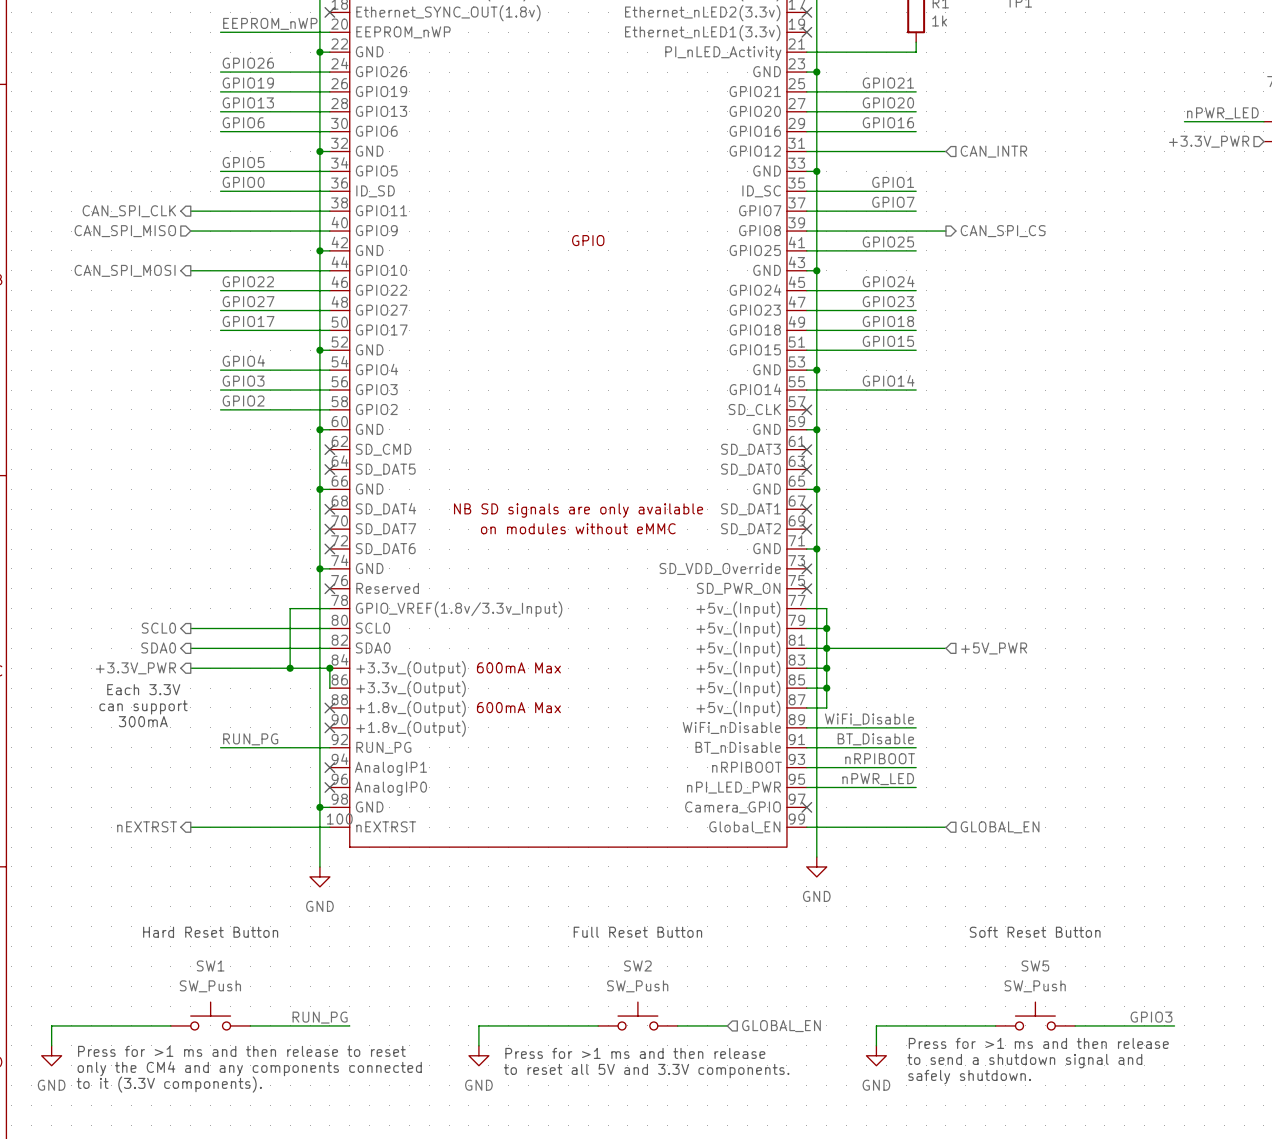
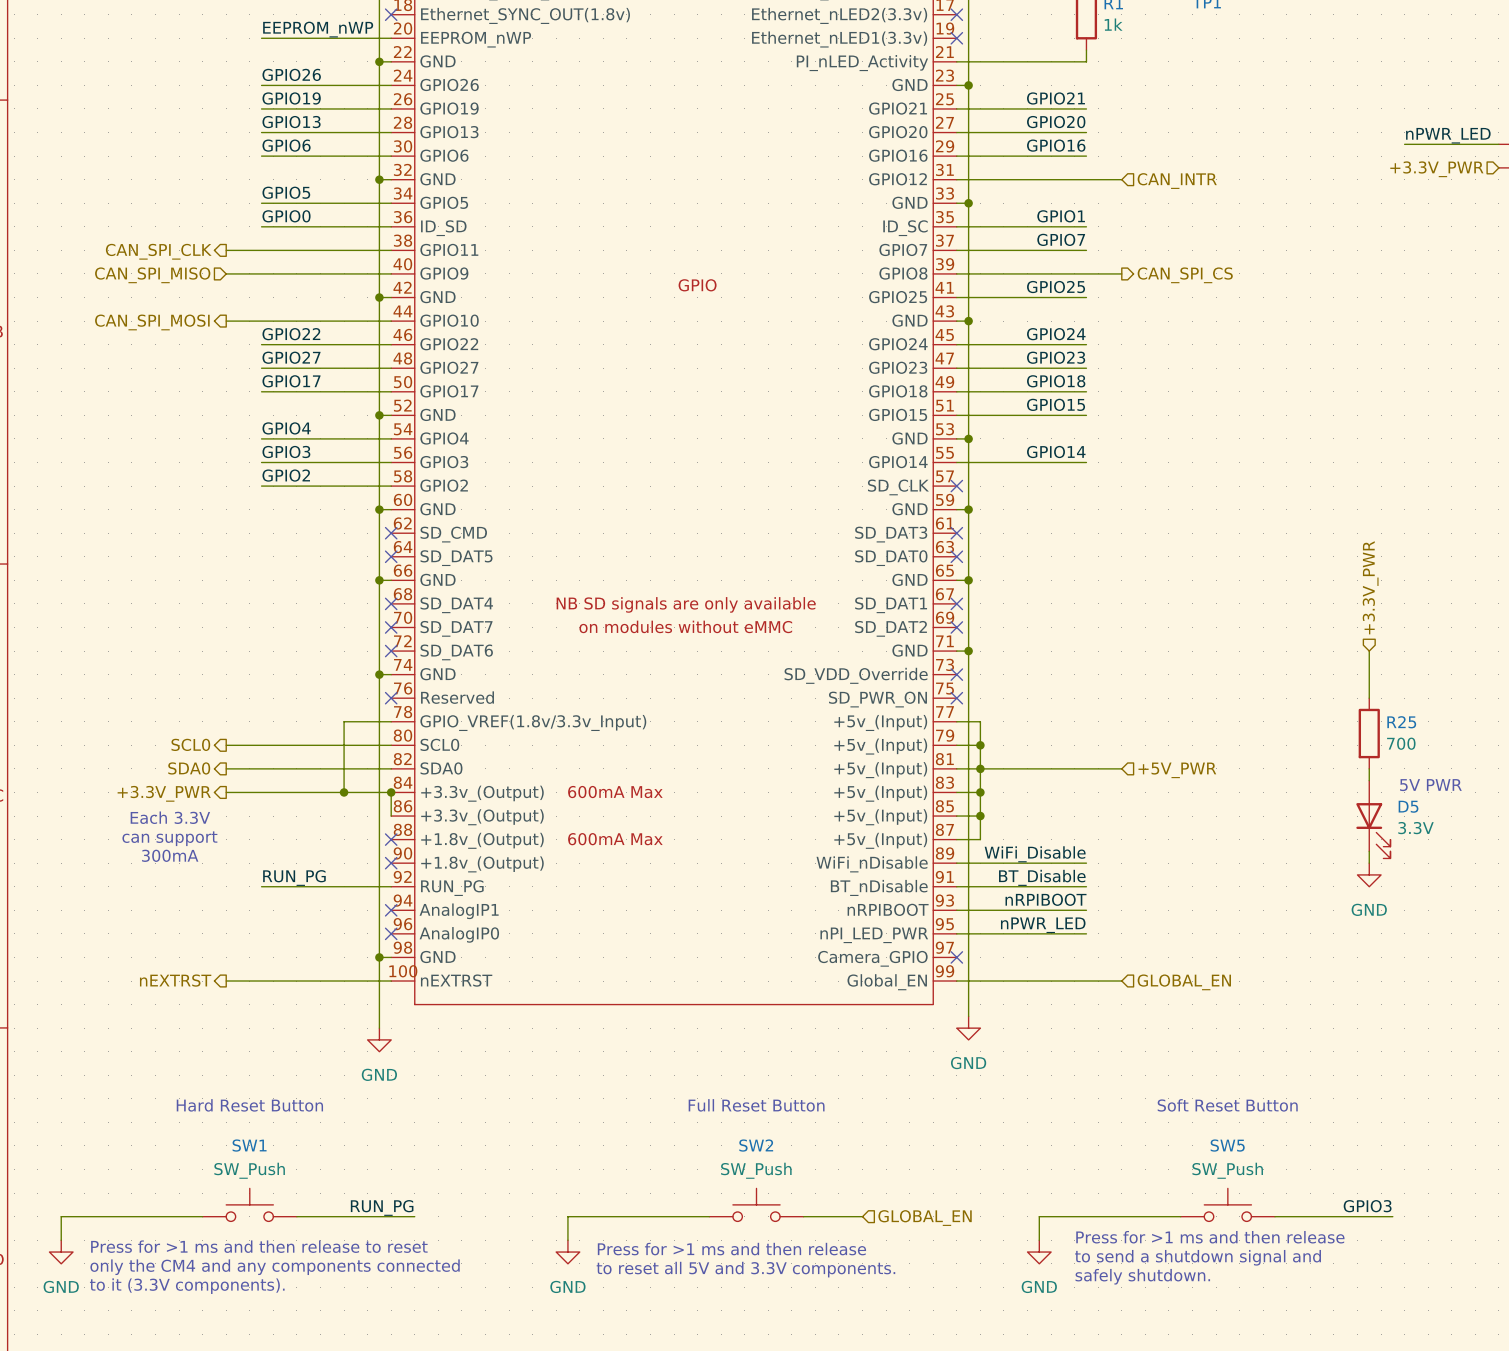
hierarchical label: none -> +3.3V_PWR (1370, 587)
wire: none -> (1369, 651) (1369, 698)
R25: none -> 700 (1369, 733)
wire: none -> (1369, 768) (1369, 780)
text: none -> 5V PWR (1430, 785)
D5: none -> 3.3V (1373, 819)
wire: none -> (1369, 851) (1369, 863)
power symbol: none -> GND (1369, 874)

